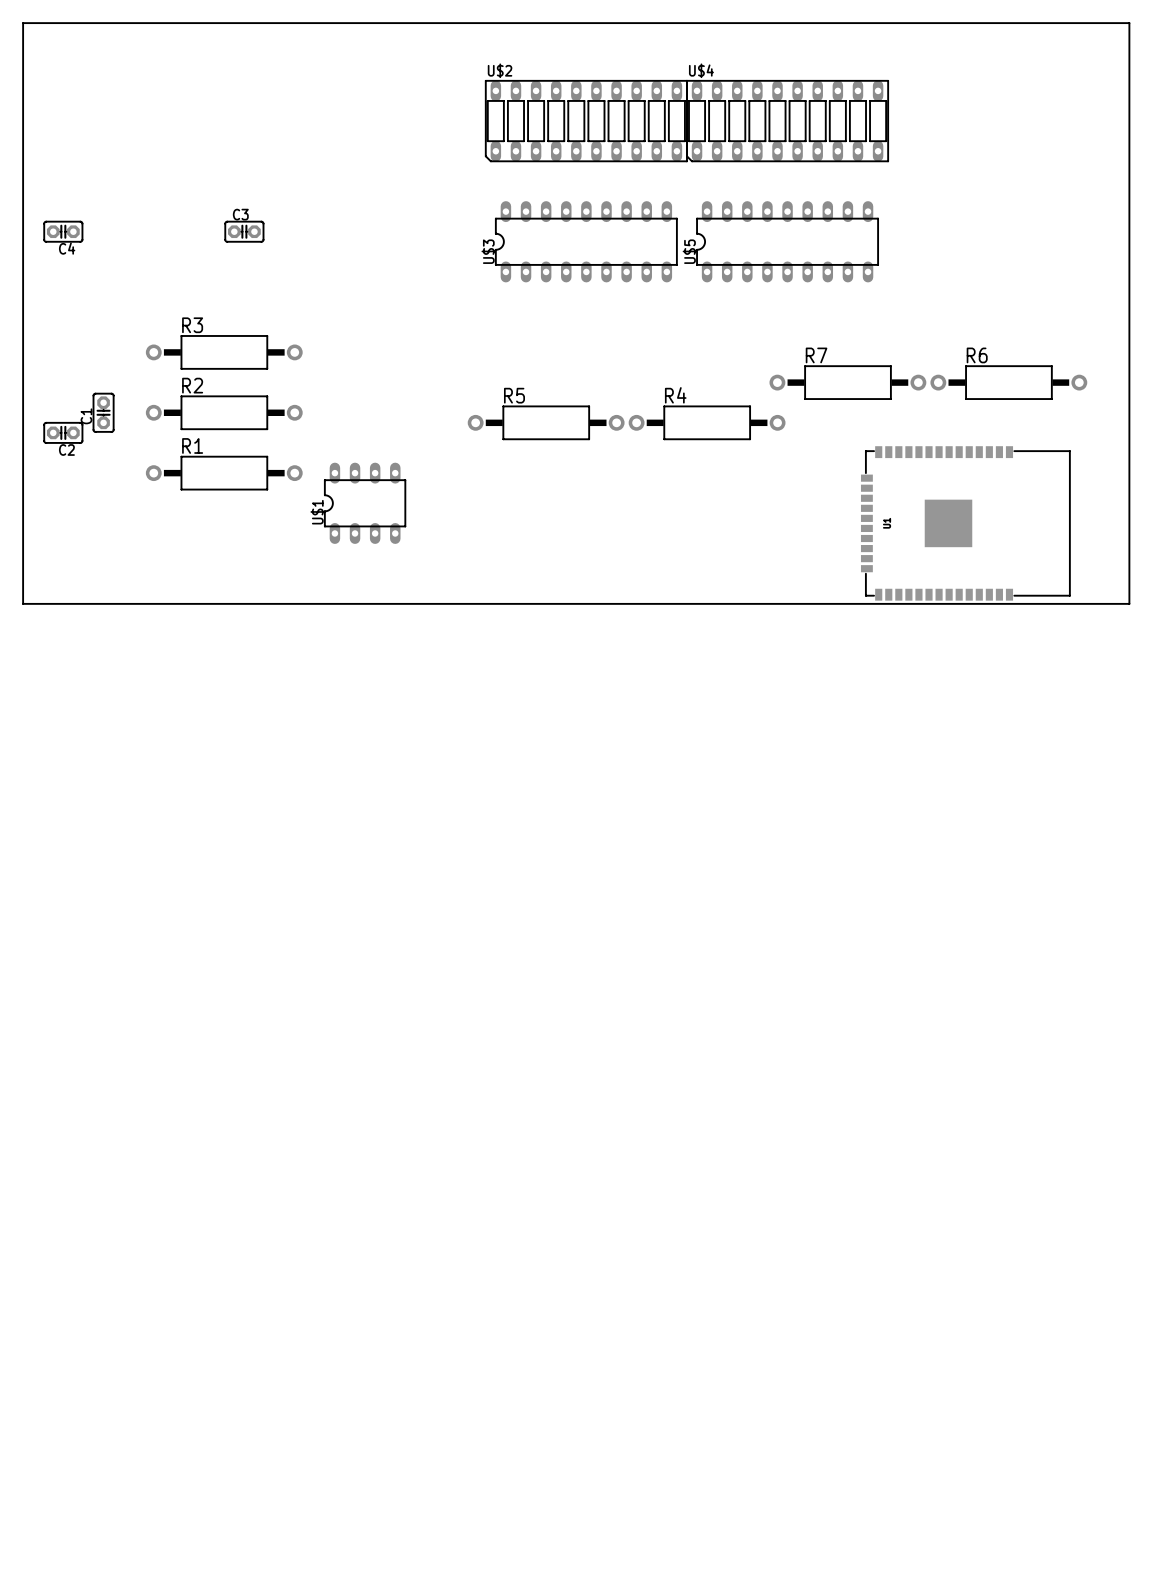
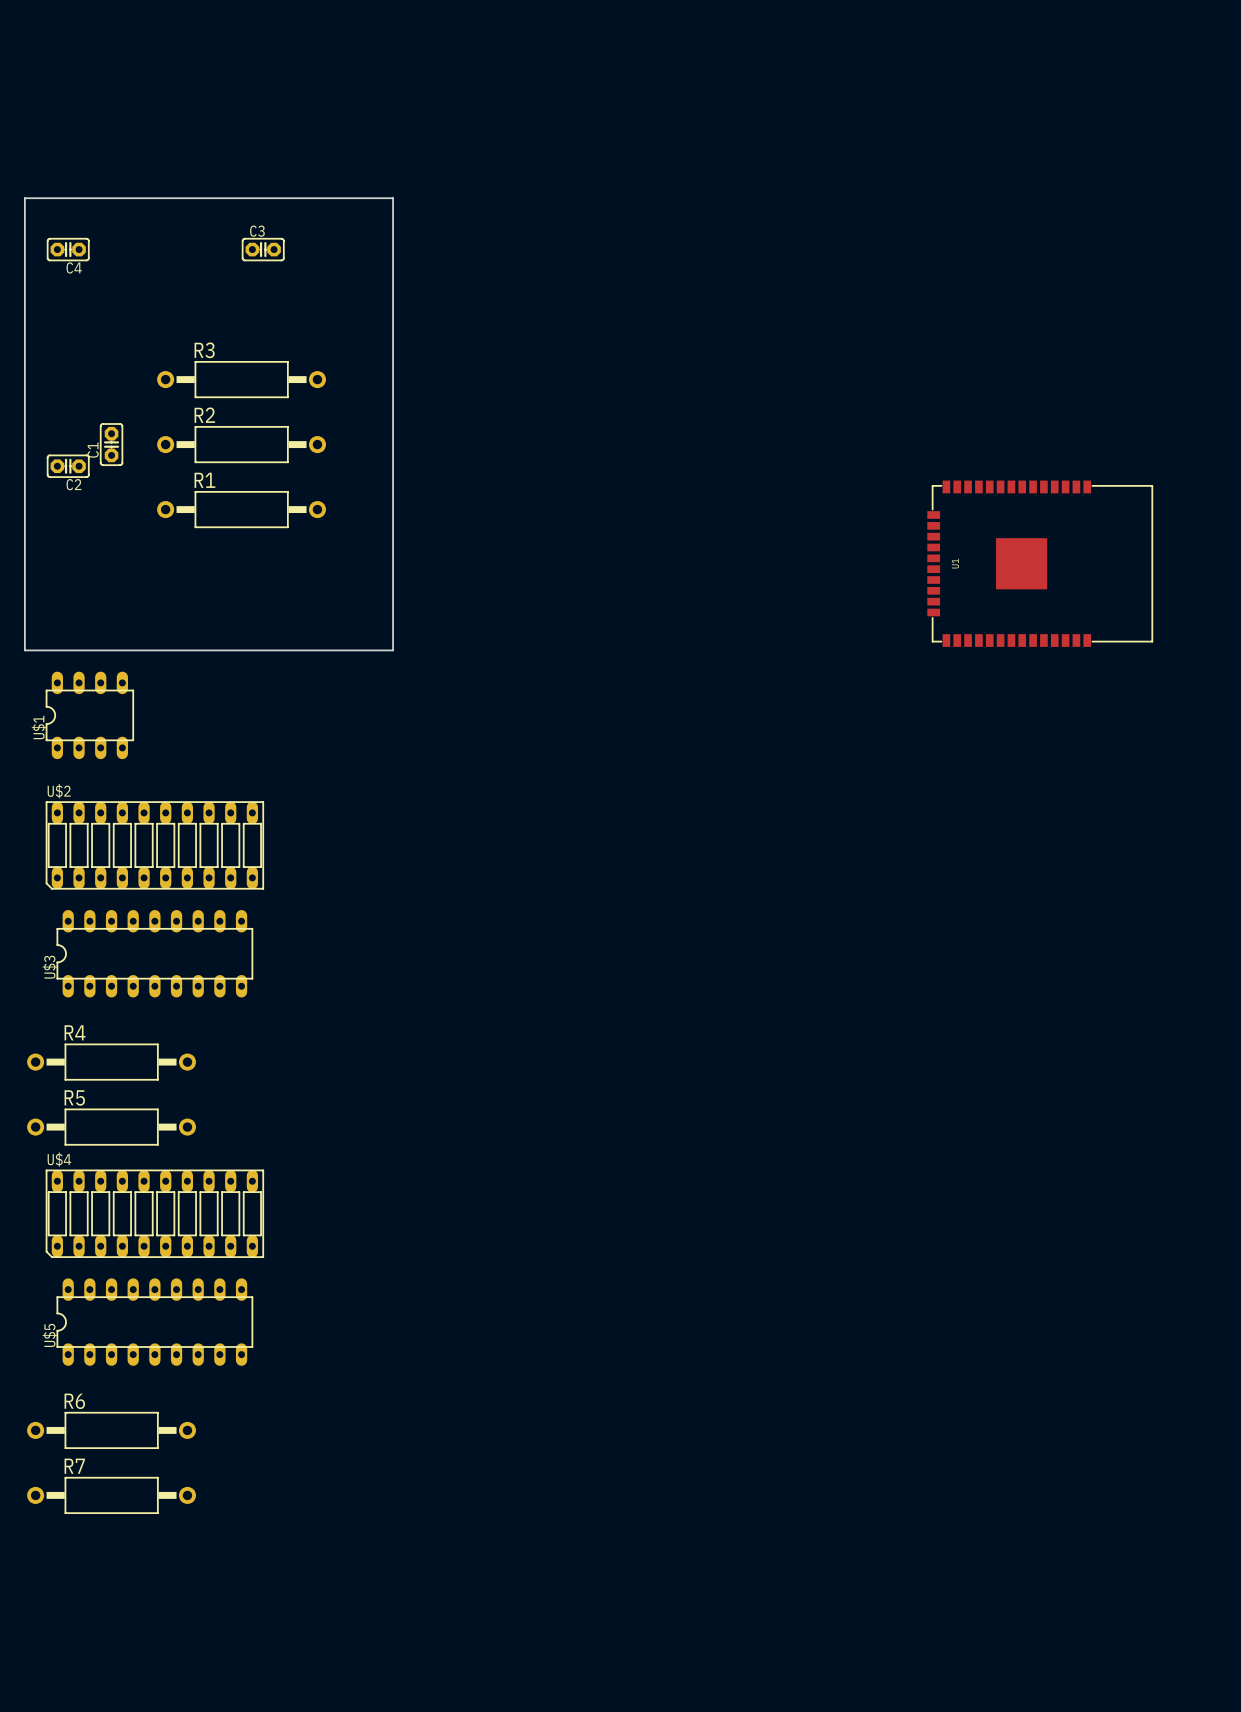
U$2 position: (586, 121) -> (154, 845)
U$4 position: (787, 121) -> (154, 1213)
board edge: (23, 184) (23, 23) (1129, 23) (1129, 603) (364, 603) -> (24, 198) (393, 198) (393, 650)
U$3 position: (586, 241) -> (154, 953)
U$5 position: (787, 241) -> (154, 1322)
R7 position: (847, 382) -> (111, 1495)
R6 position: (1008, 382) -> (111, 1430)
R5 position: (546, 422) -> (111, 1127)
R4 position: (707, 422) -> (111, 1062)
U$1 position: (365, 503) -> (89, 715)

